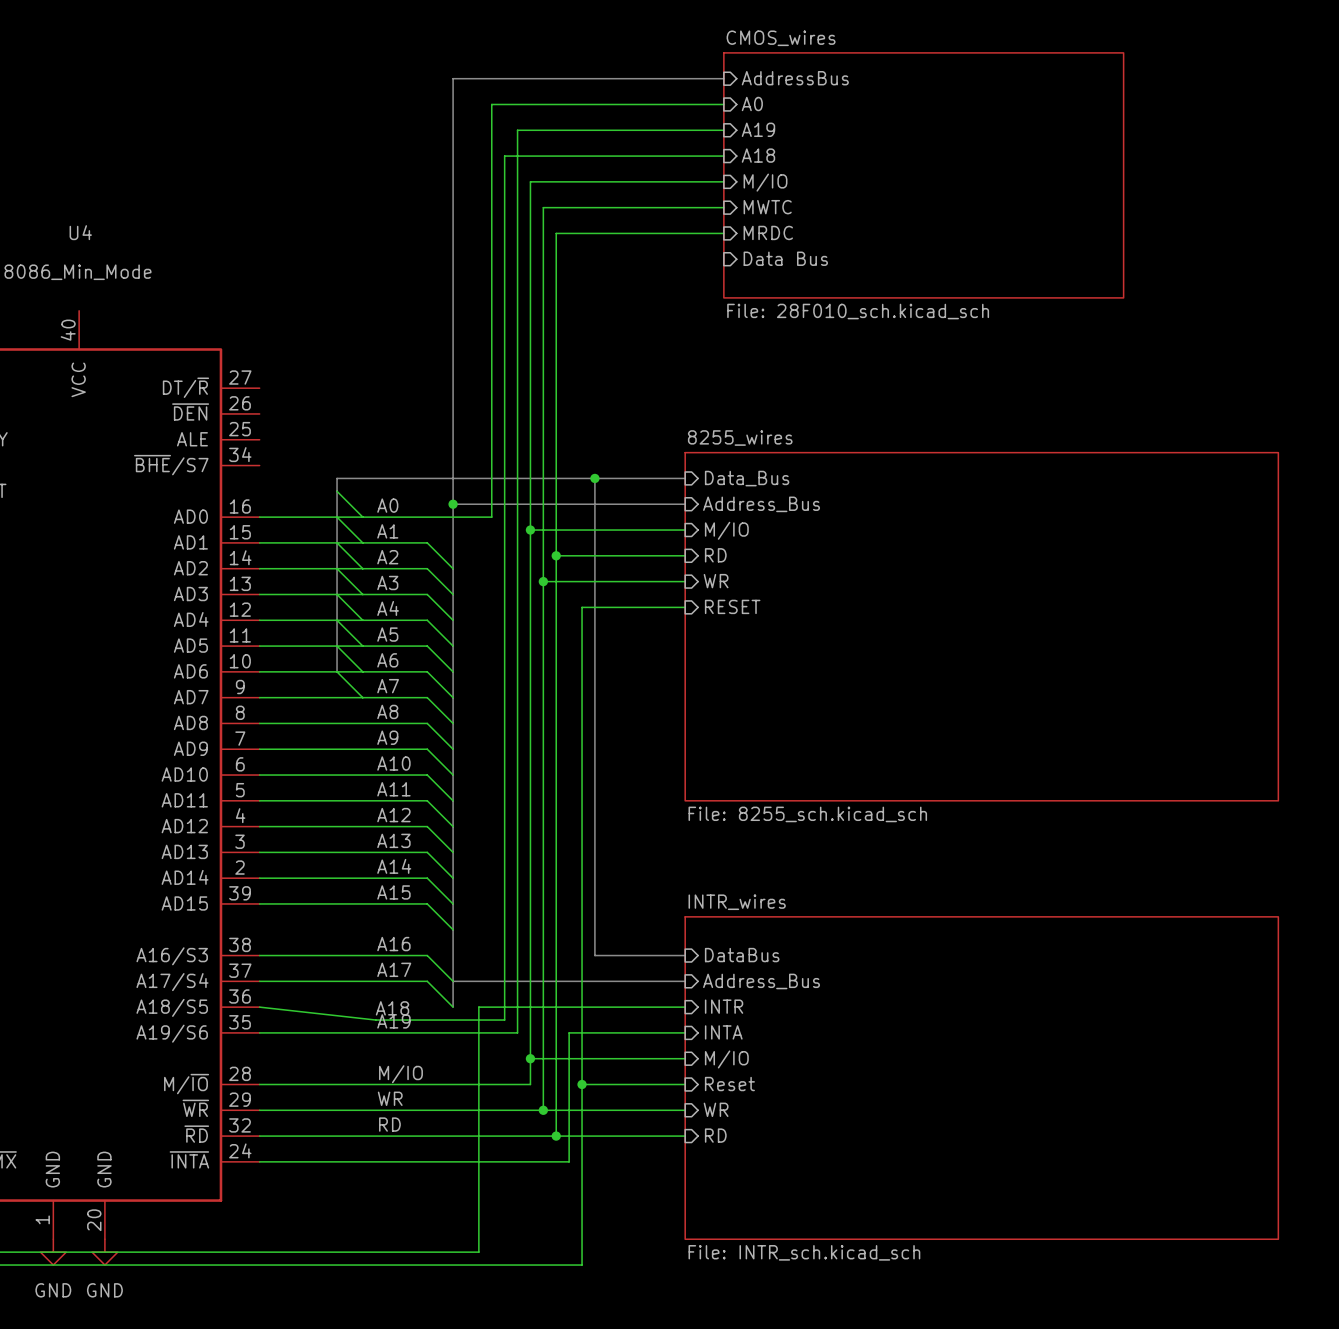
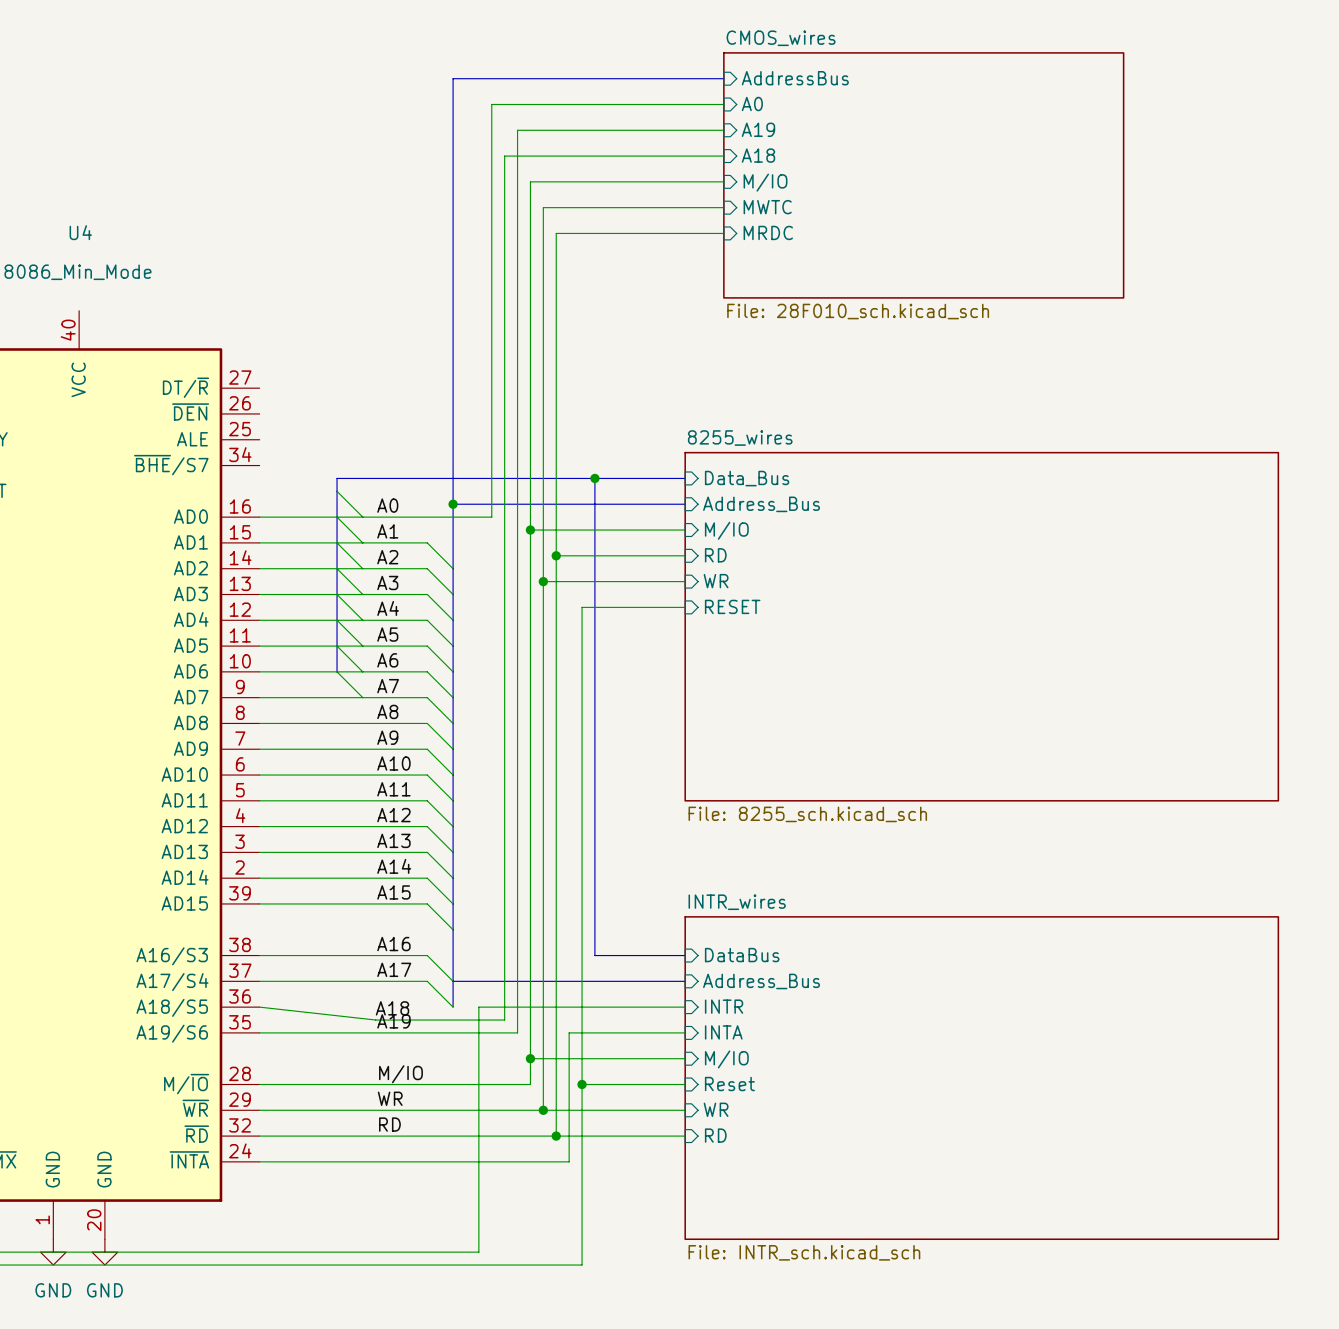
sheet pin: Data Bus (785, 258) -> none

